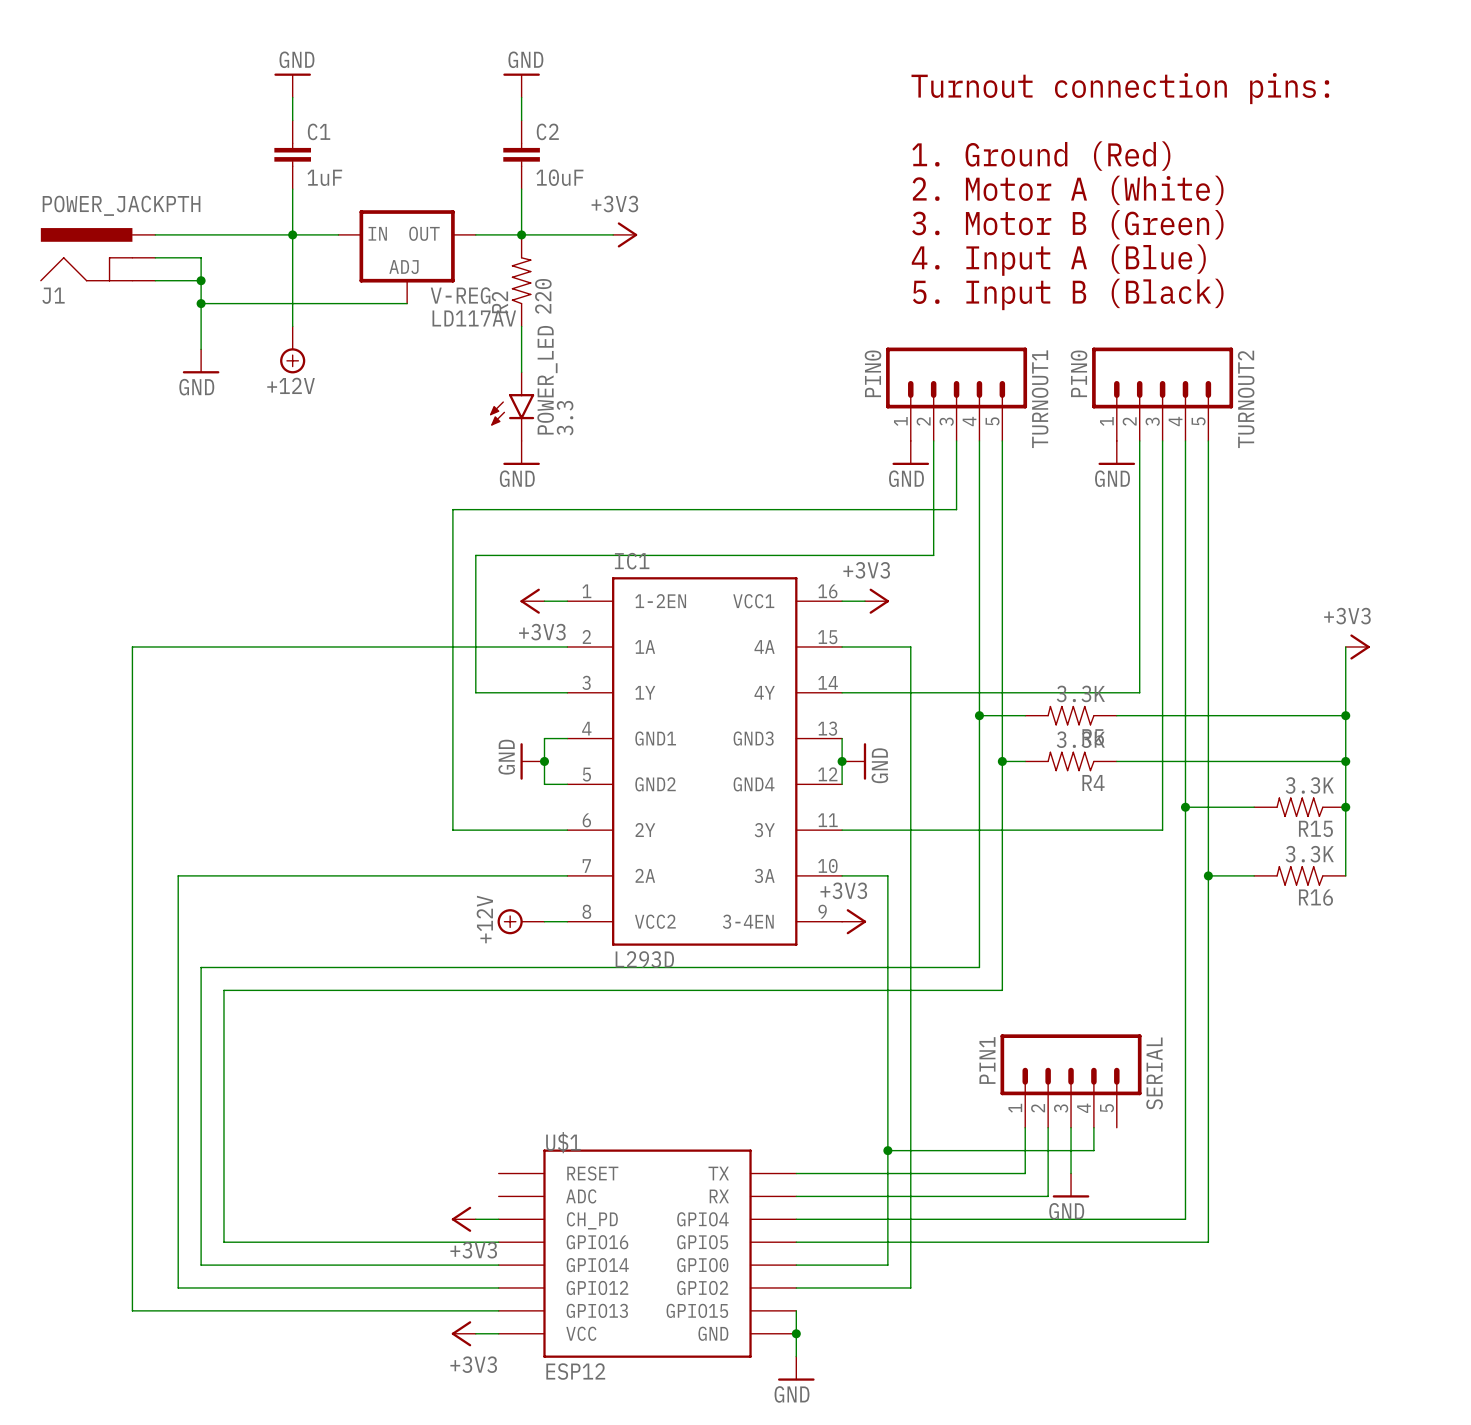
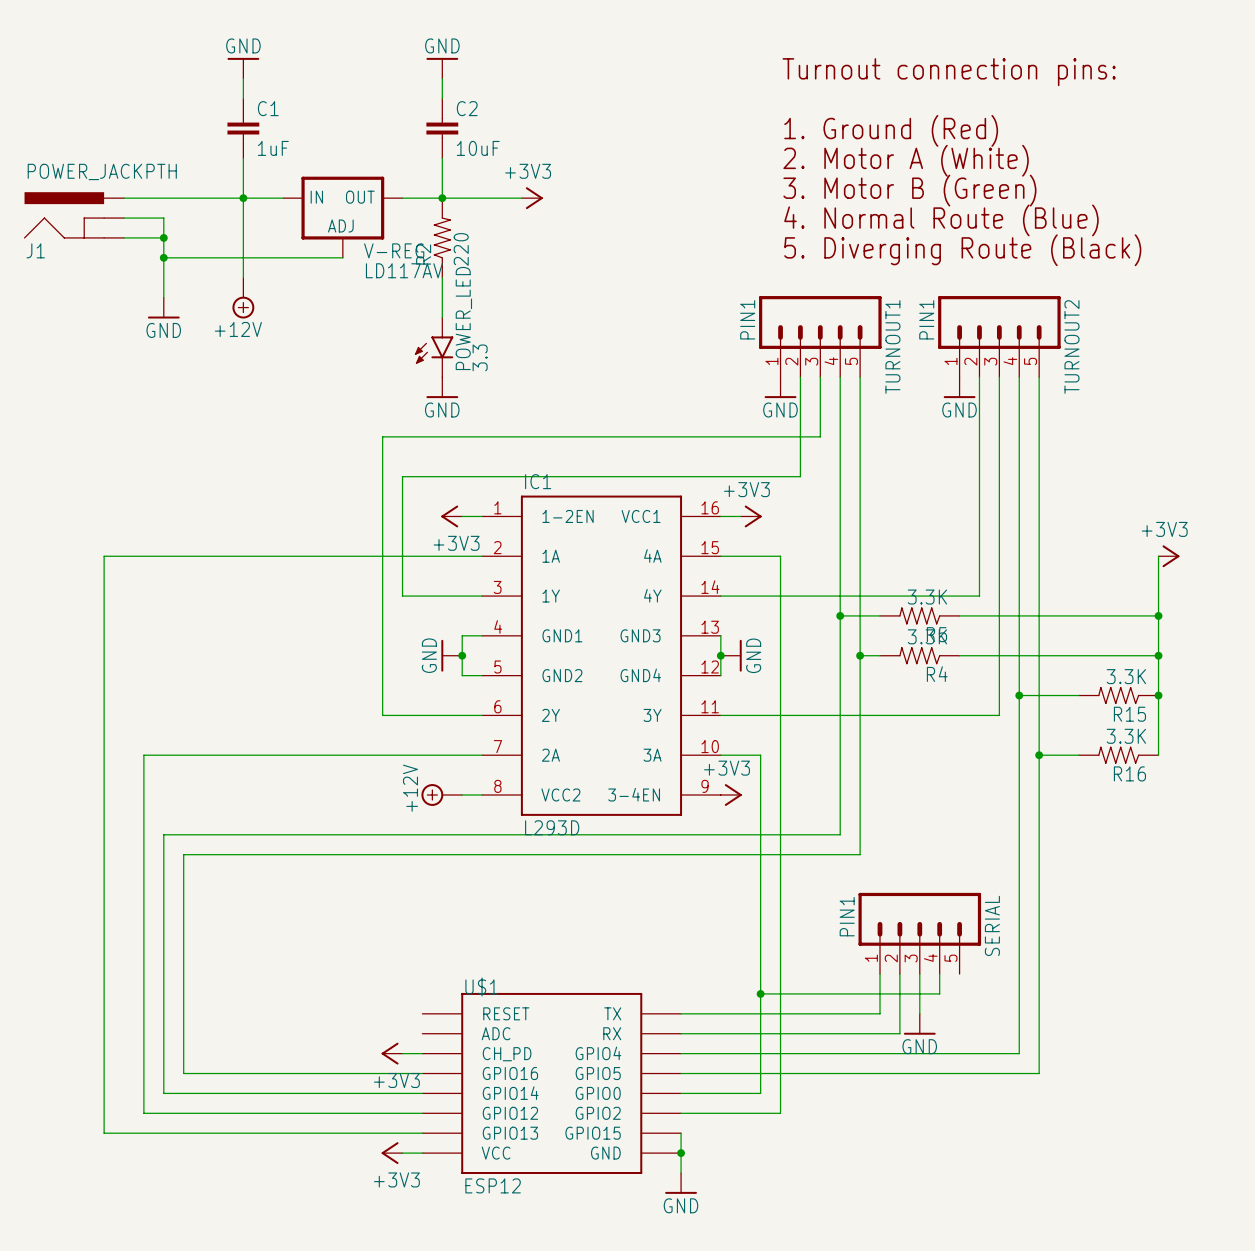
text: 4. Input A (Blue) (1058, 260) -> 4. Normal Route (Blue) (941, 220)
text: 5. Input B (Black) (1068, 294) -> 5. Diverging Route (Black) (962, 250)
TURNOUT1 value: PIN0 (873, 373) -> PIN1 (747, 319)
TURNOUT2 value: PIN0 (1079, 373) -> PIN1 (926, 319)

